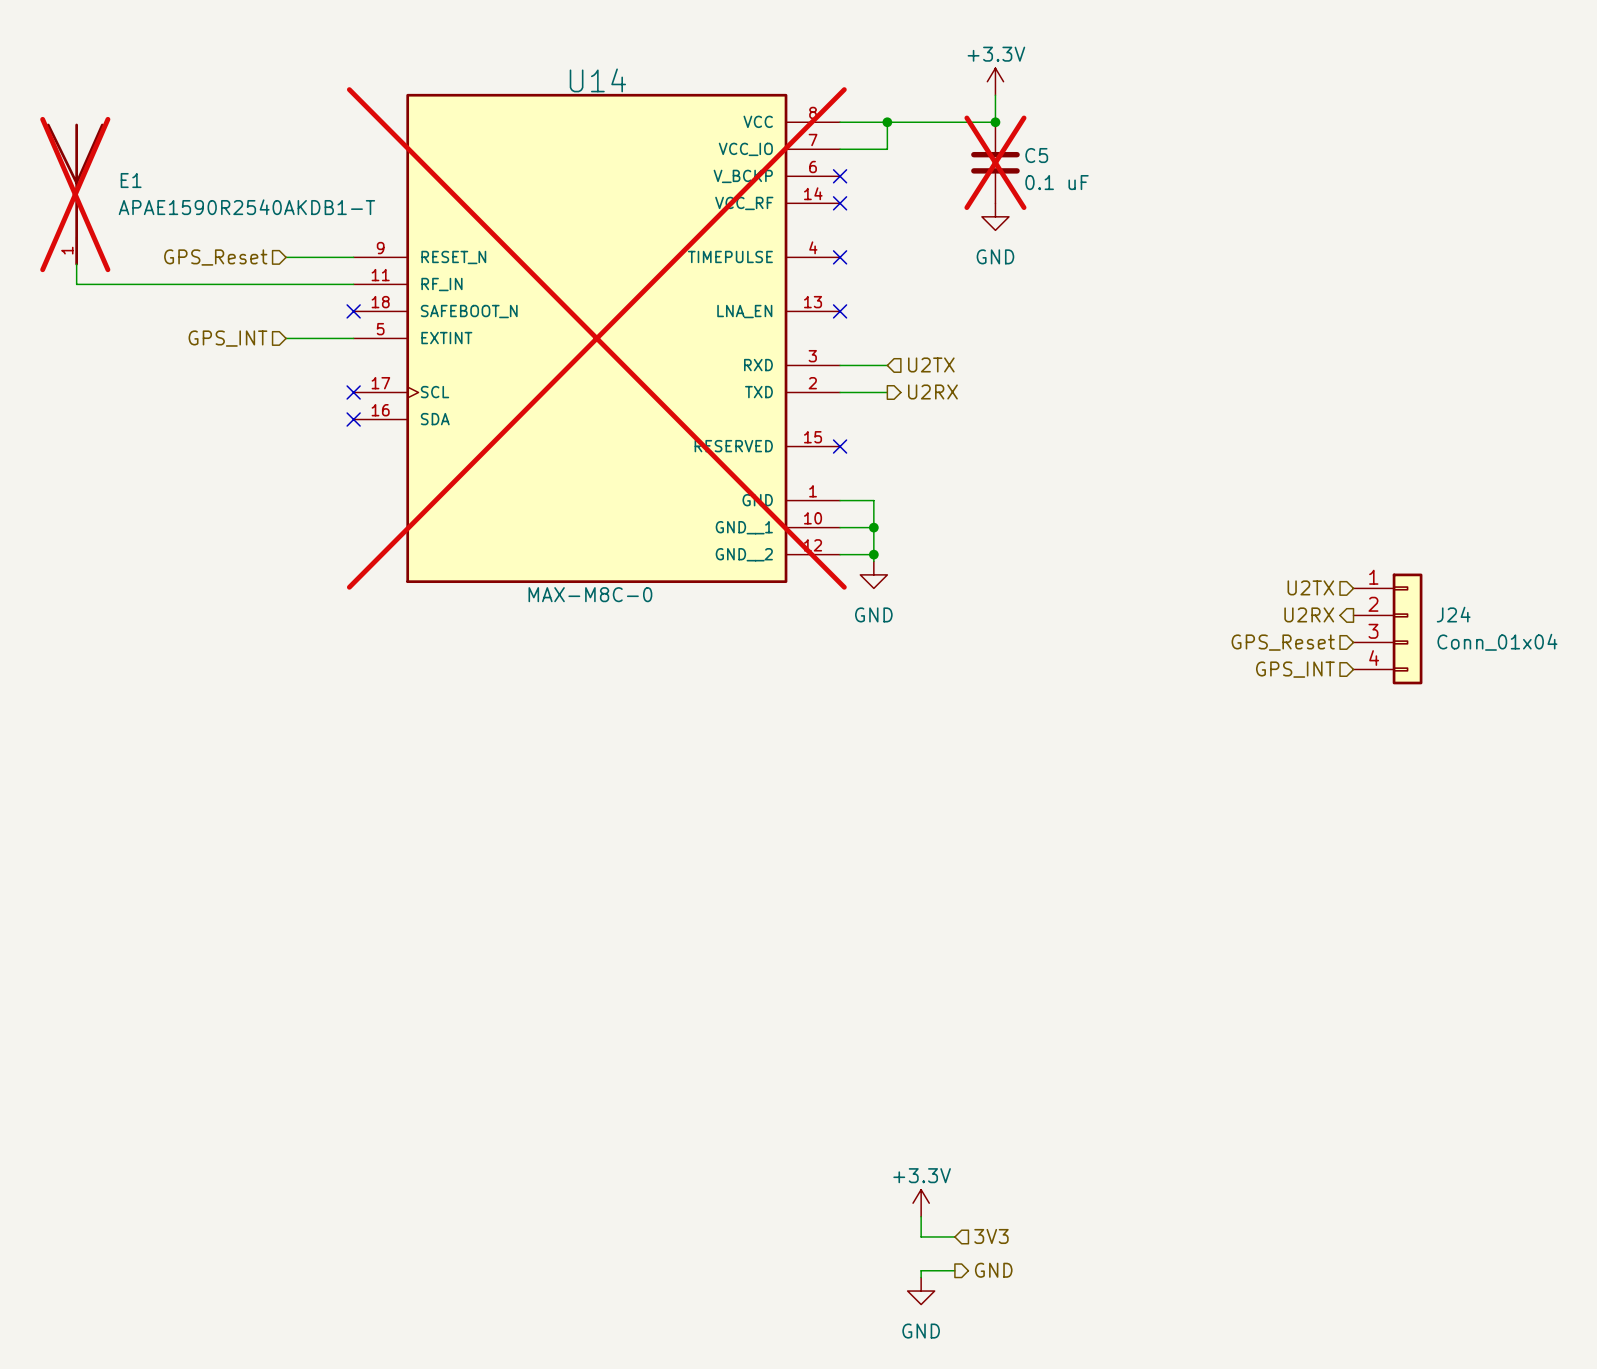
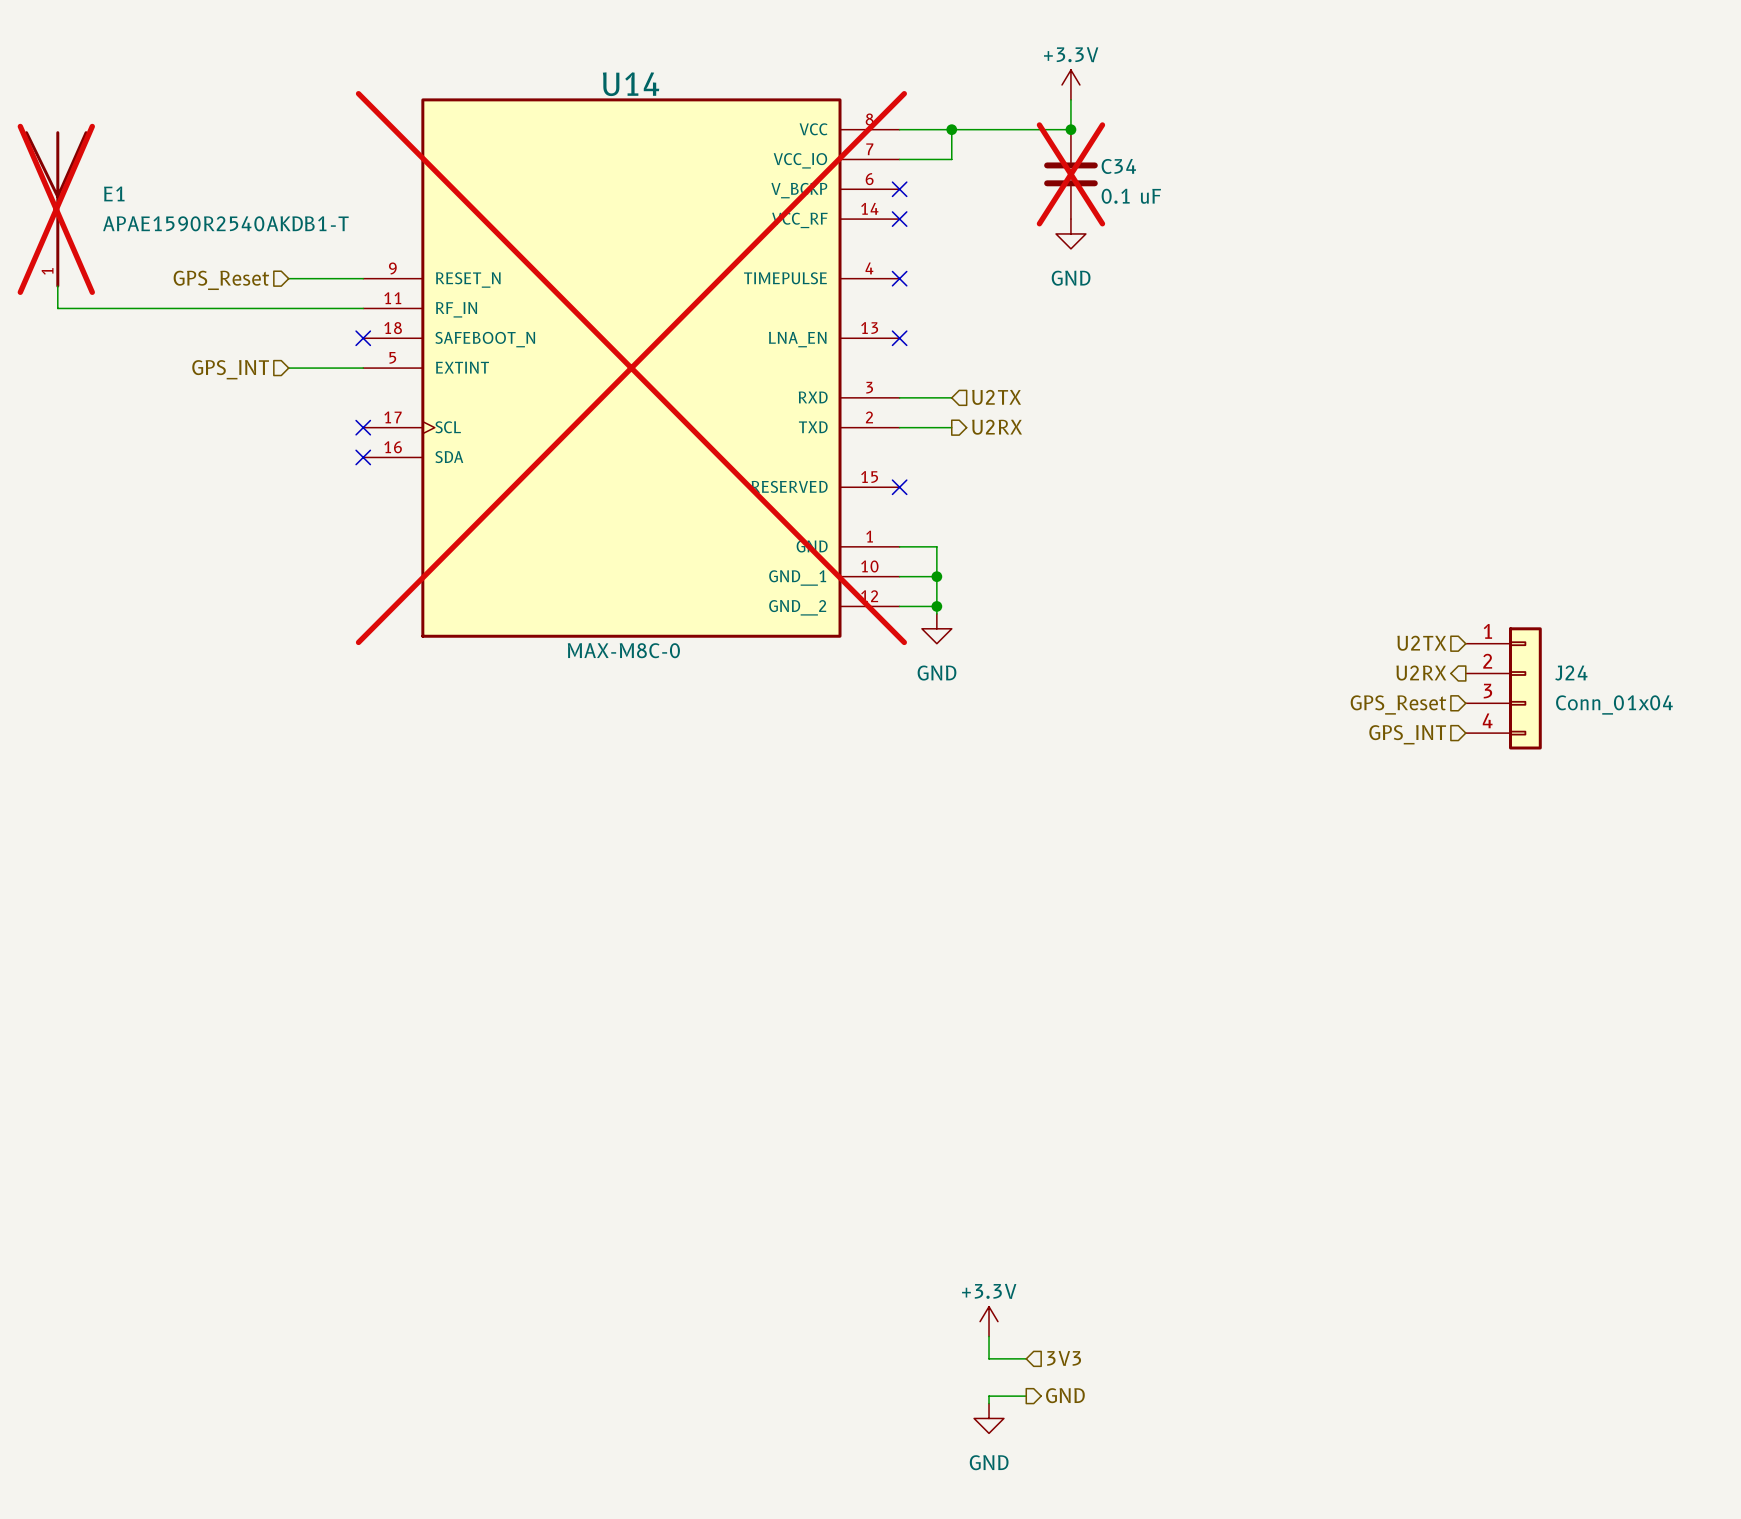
C5 name: C5 (1036, 155) -> C34 (1118, 166)

